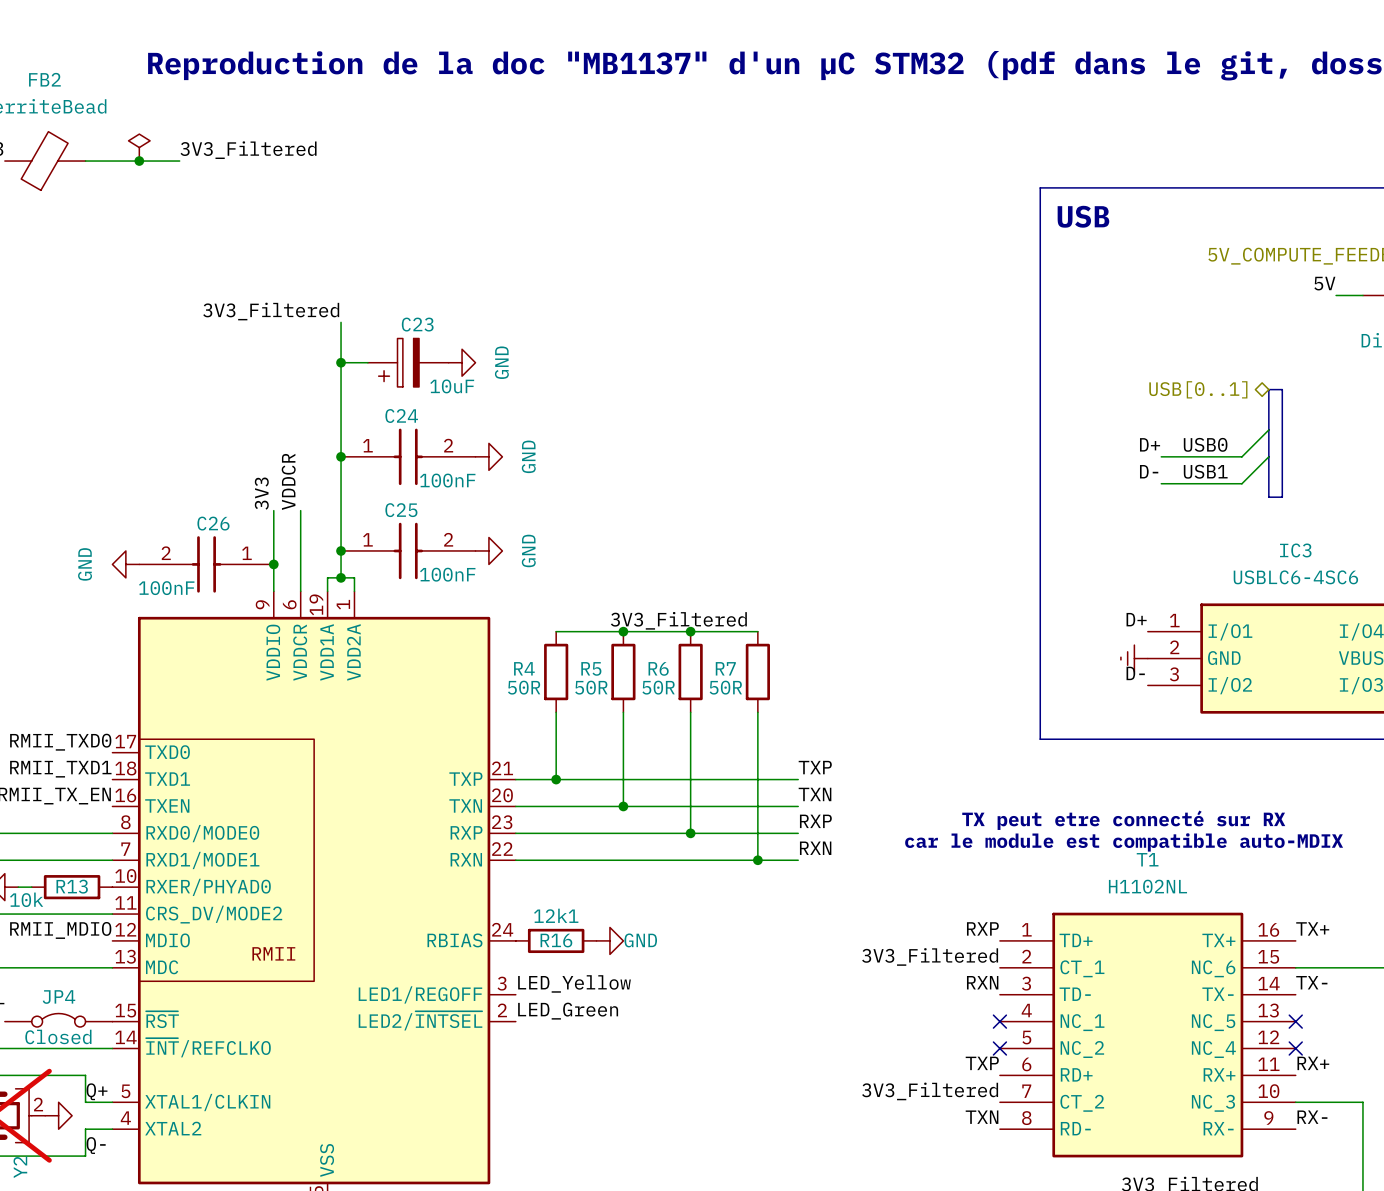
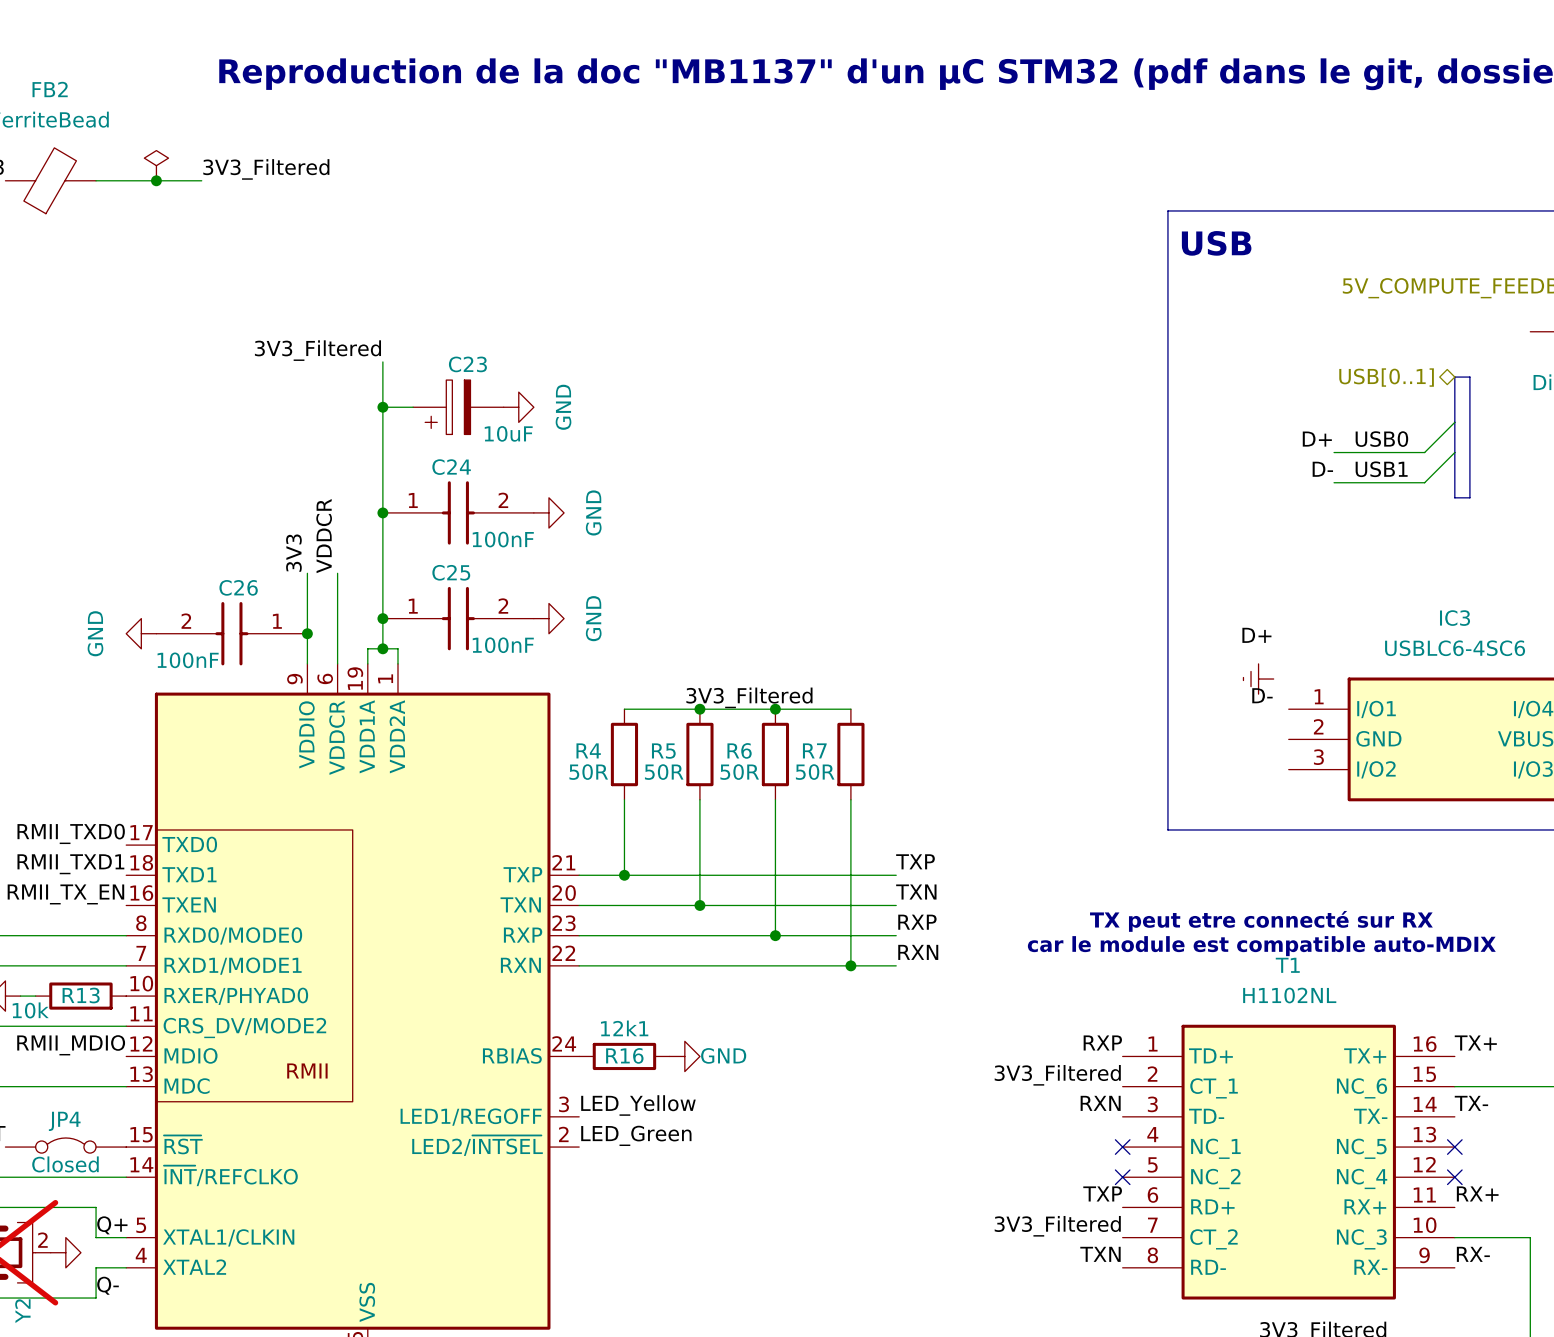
label: 5V (1324, 283) -> none
wire: (1336, 295) (1362, 295) -> none
hierarchical label position: USB[0..1] (1198, 389) -> USB[0..1] (1386, 377)
bus: (1268, 389) (1268, 497) (1282, 497) (1282, 389) (1268, 389) -> (1454, 377) (1454, 497) (1469, 497) (1469, 377) (1454, 377)
wire: (1268, 429) (1241, 456) (1161, 456) -> (1454, 422) (1424, 452) (1334, 452)
label position: D+ (1150, 444) -> D+ (1317, 439)
label position: USB0 (1205, 444) -> USB0 (1381, 439)
wire: (1268, 456) (1241, 483) (1161, 483) -> (1454, 452) (1424, 482) (1334, 482)
label position: D- (1149, 471) -> D- (1322, 469)
label position: USB1 (1205, 471) -> USB1 (1381, 469)
label position: D+ (1136, 619) -> D+ (1256, 635)
power symbol position: (1134, 658) -> (1258, 679)
label position: D- (1135, 673) -> D- (1262, 695)

